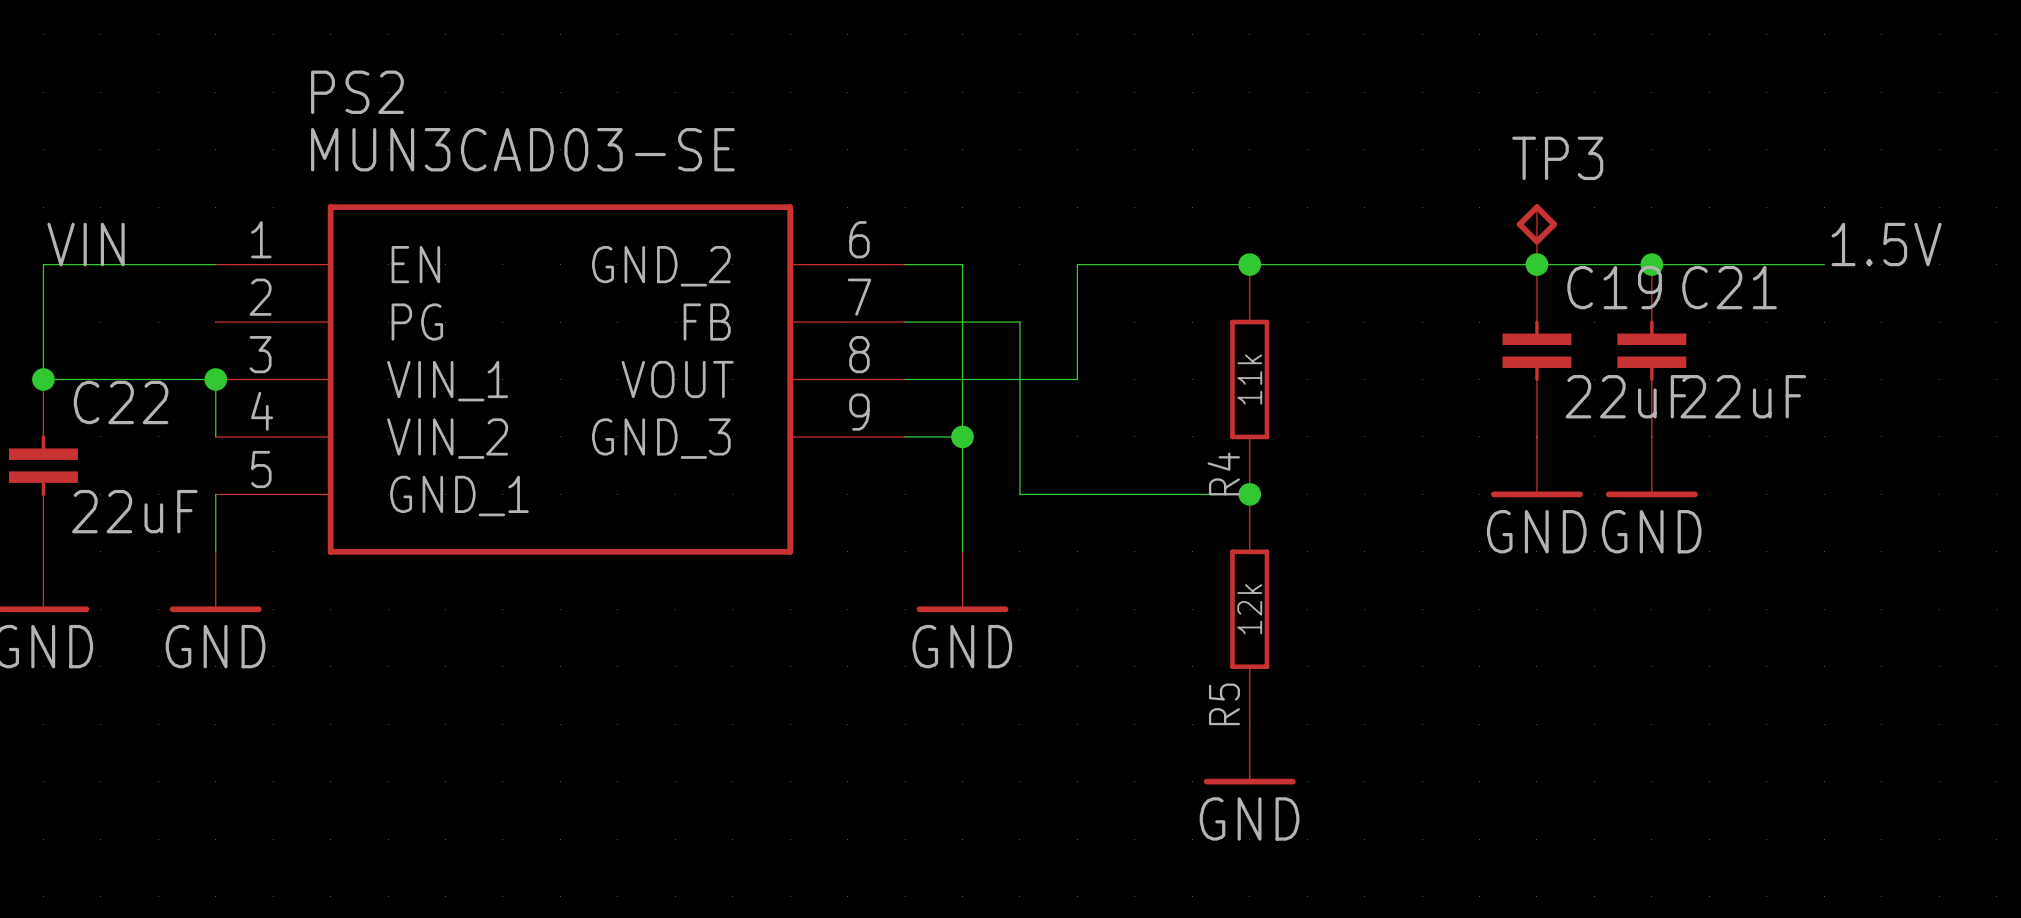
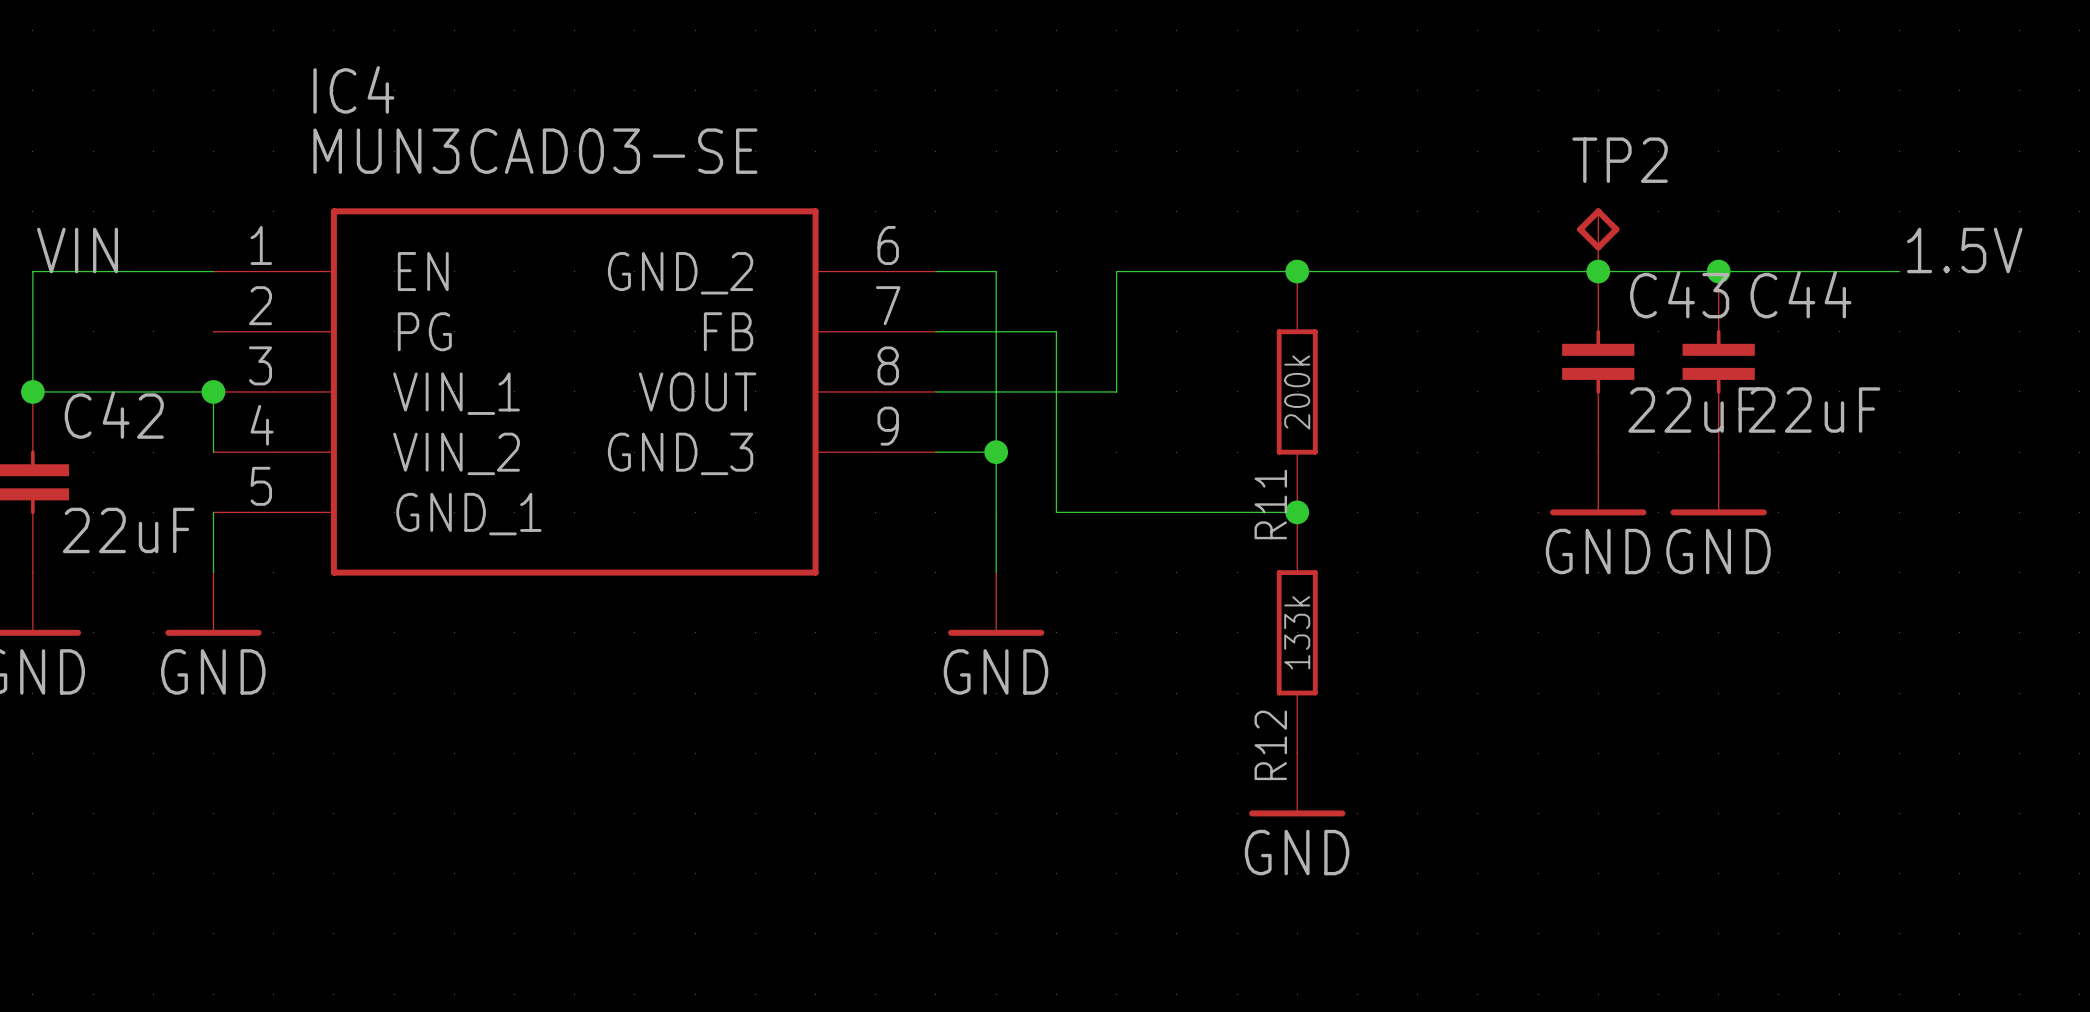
PS2 name: PS2 (357, 92) -> IC4 (353, 89)
TP3 name: TP3 (1557, 158) -> TP2 (1620, 160)
C19 name: C19 (1614, 287) -> C43 (1679, 294)
C21 name: C21 (1729, 287) -> C44 (1800, 294)
R4 value: 11k (1249, 379) -> 200k (1297, 392)
C22 name: C22 (121, 402) -> C42 (114, 415)
R4 name: R4 (1223, 473) -> R11 (1270, 504)
R5 value: 12k (1249, 609) -> 133k (1297, 632)
R5 name: R5 (1224, 704) -> R12 (1270, 745)

